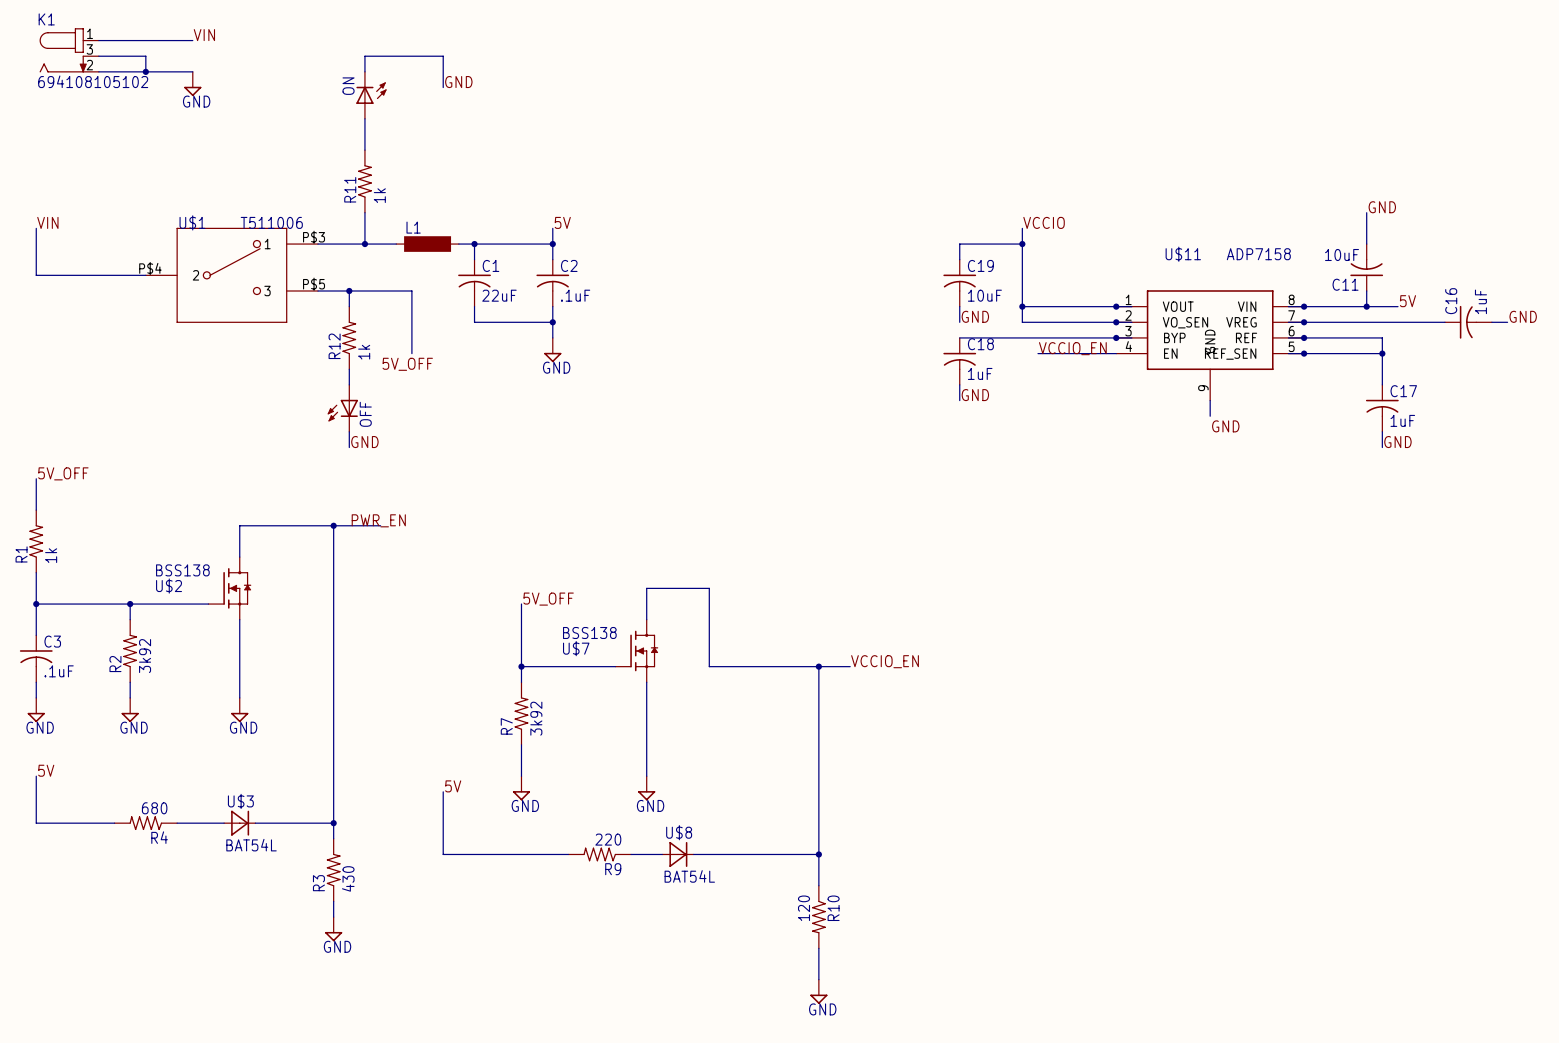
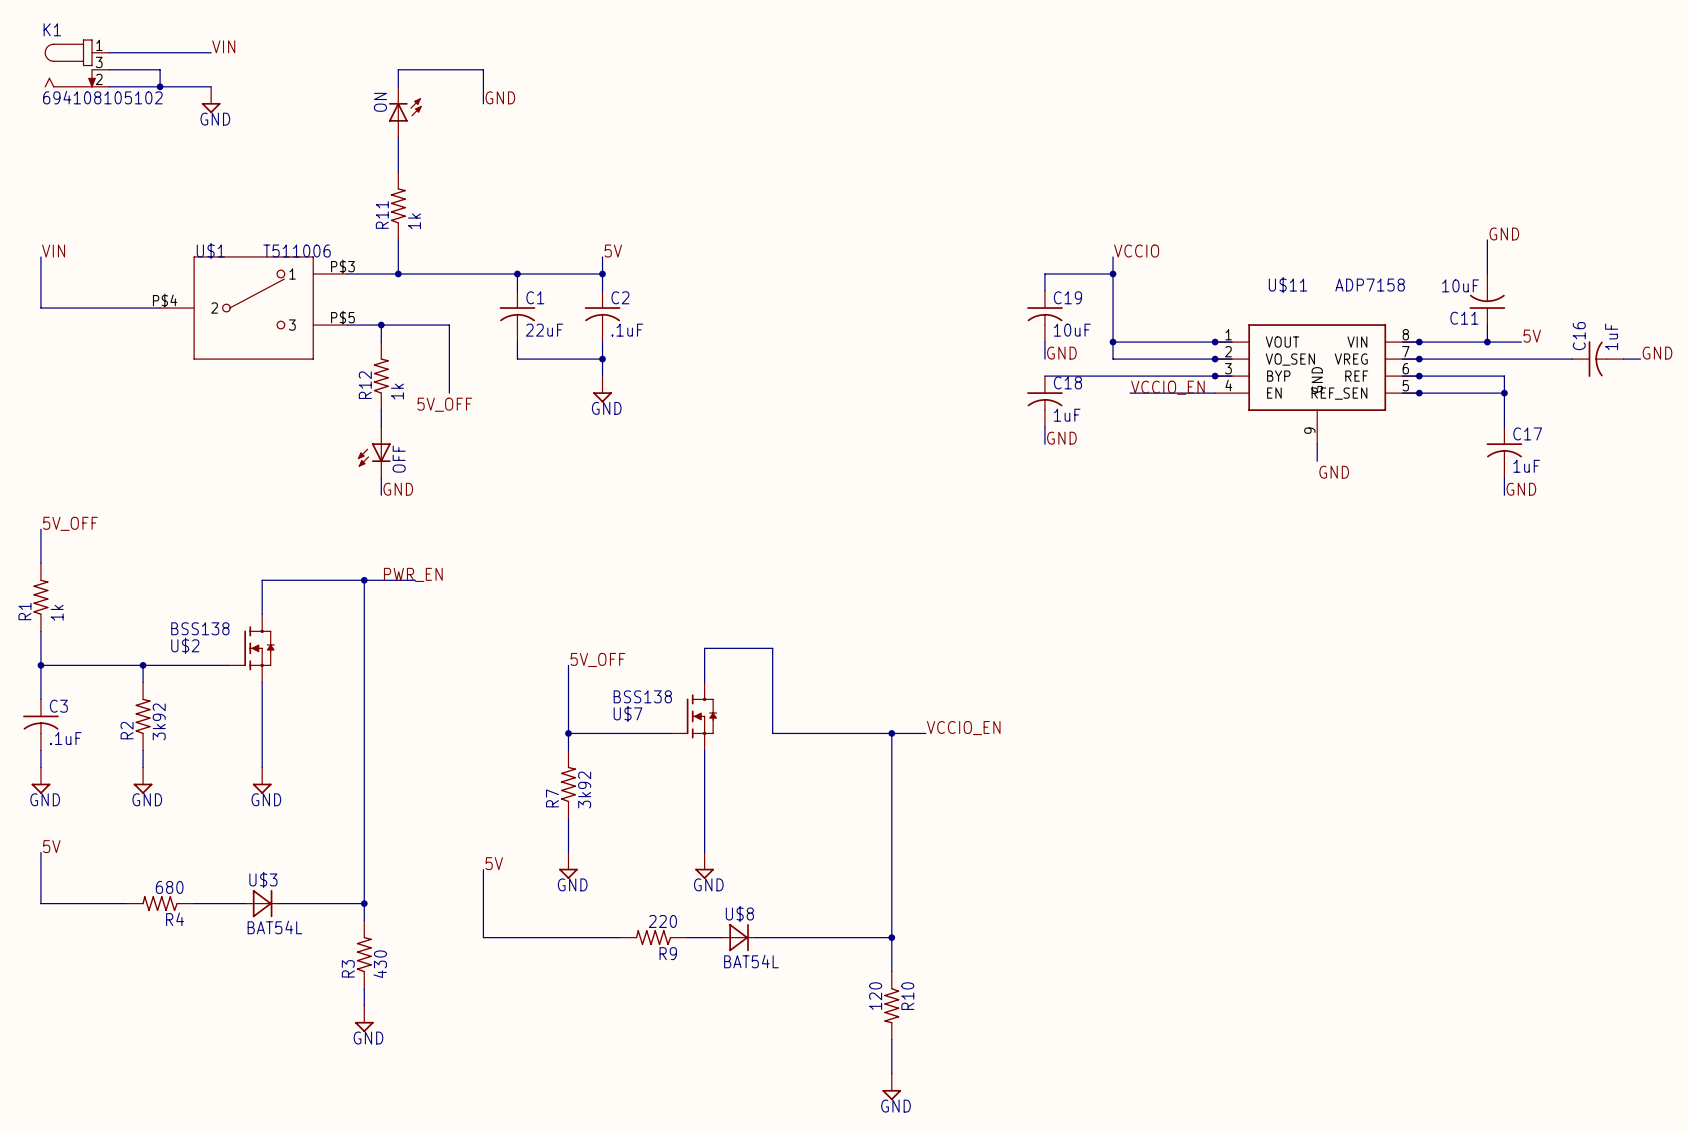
L1: (427, 244) -> none

